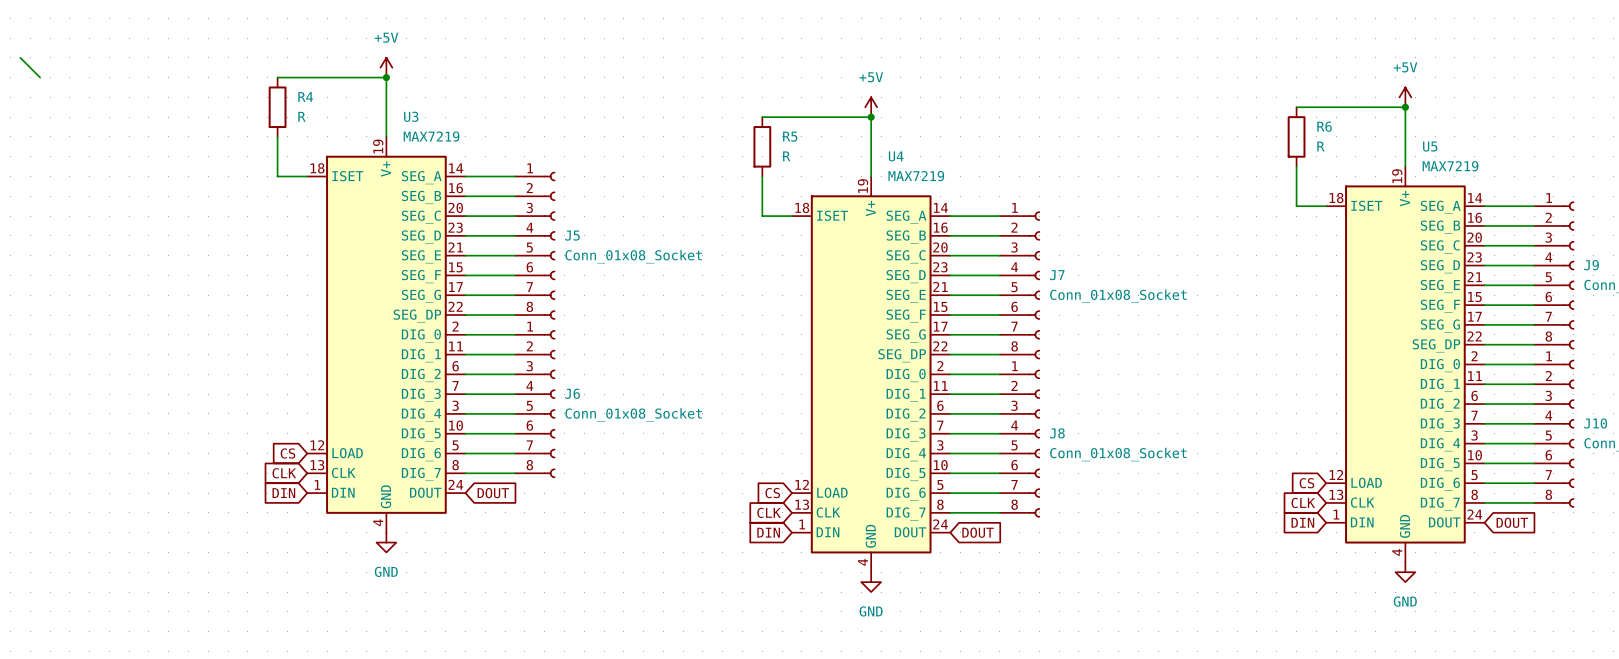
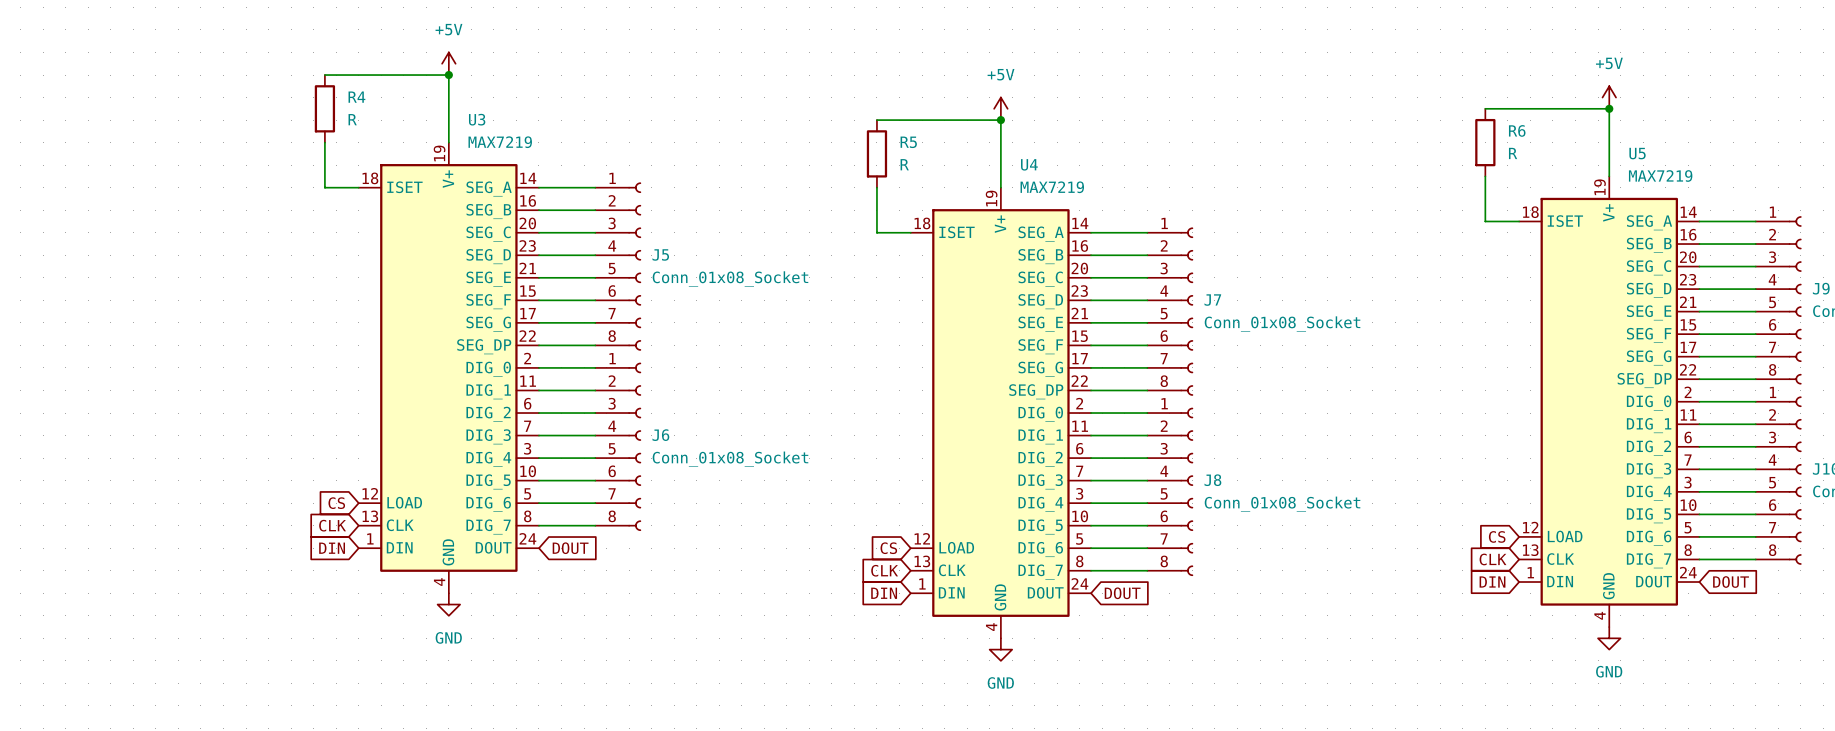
wire: (20, 57) (40, 77) -> none

